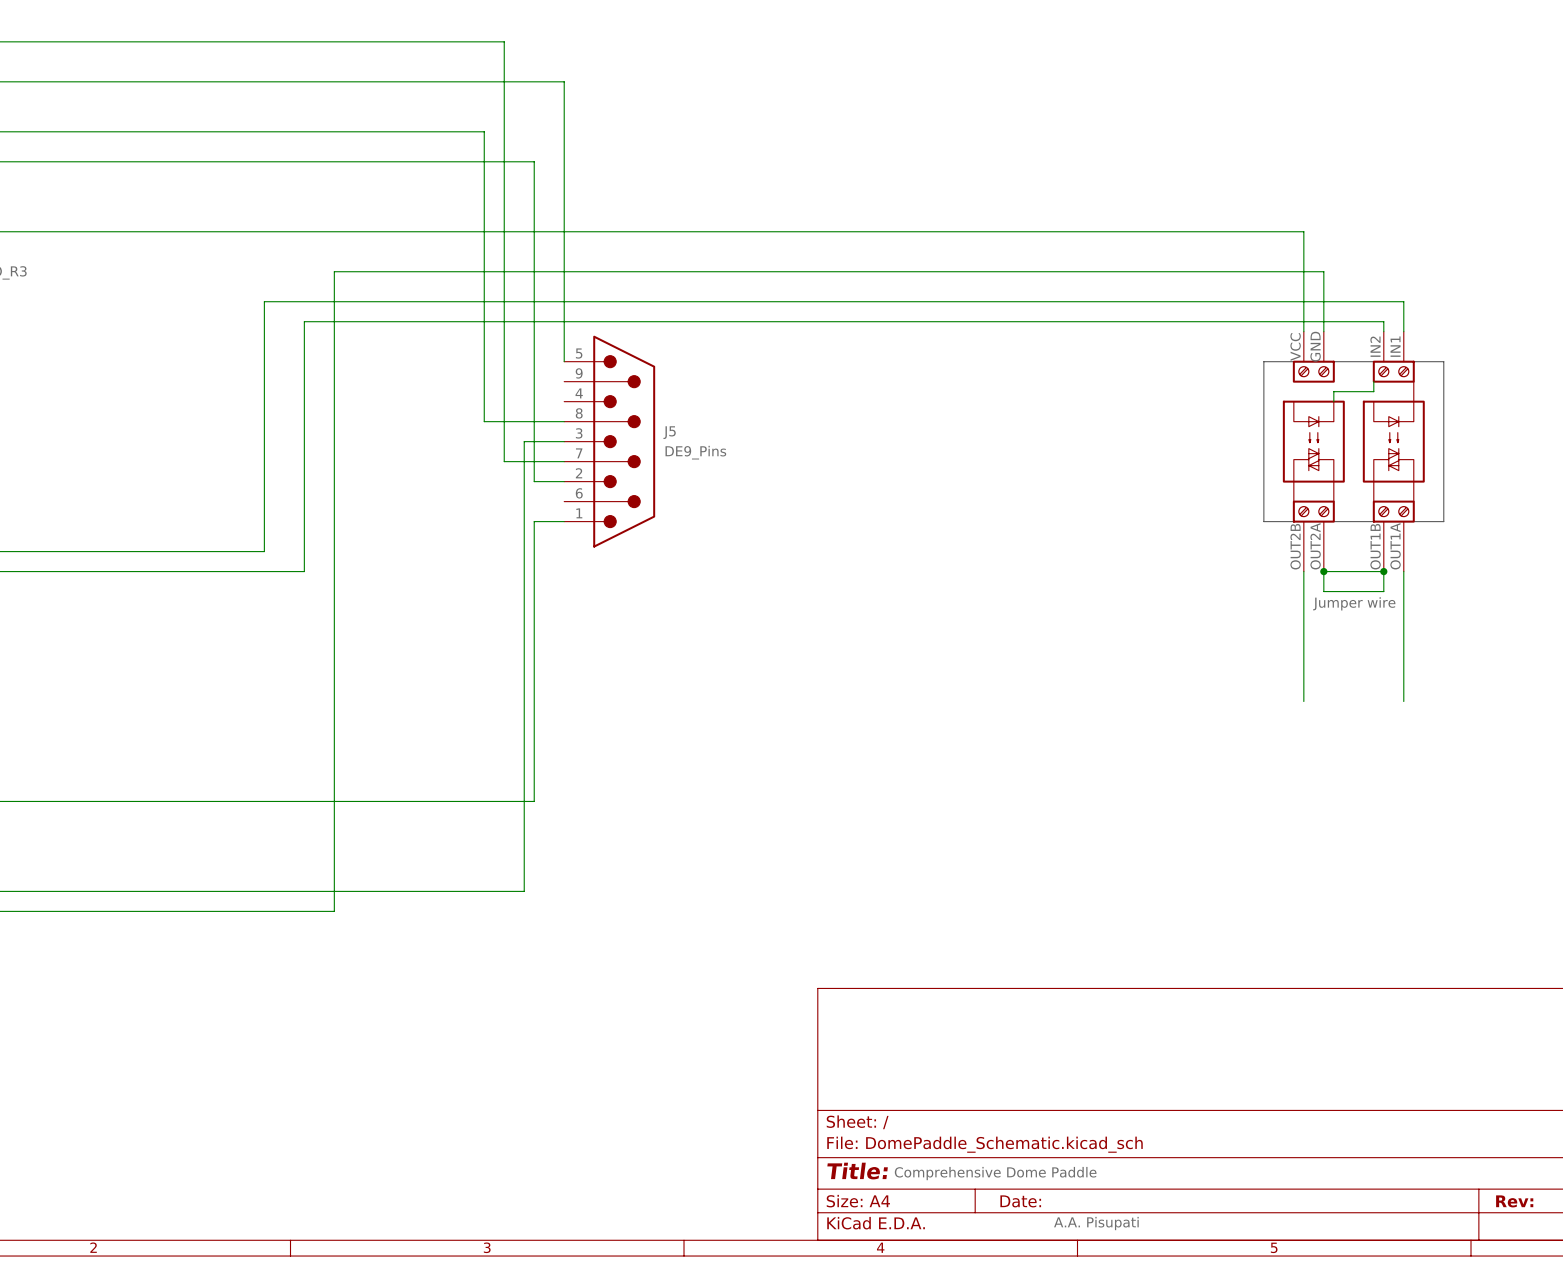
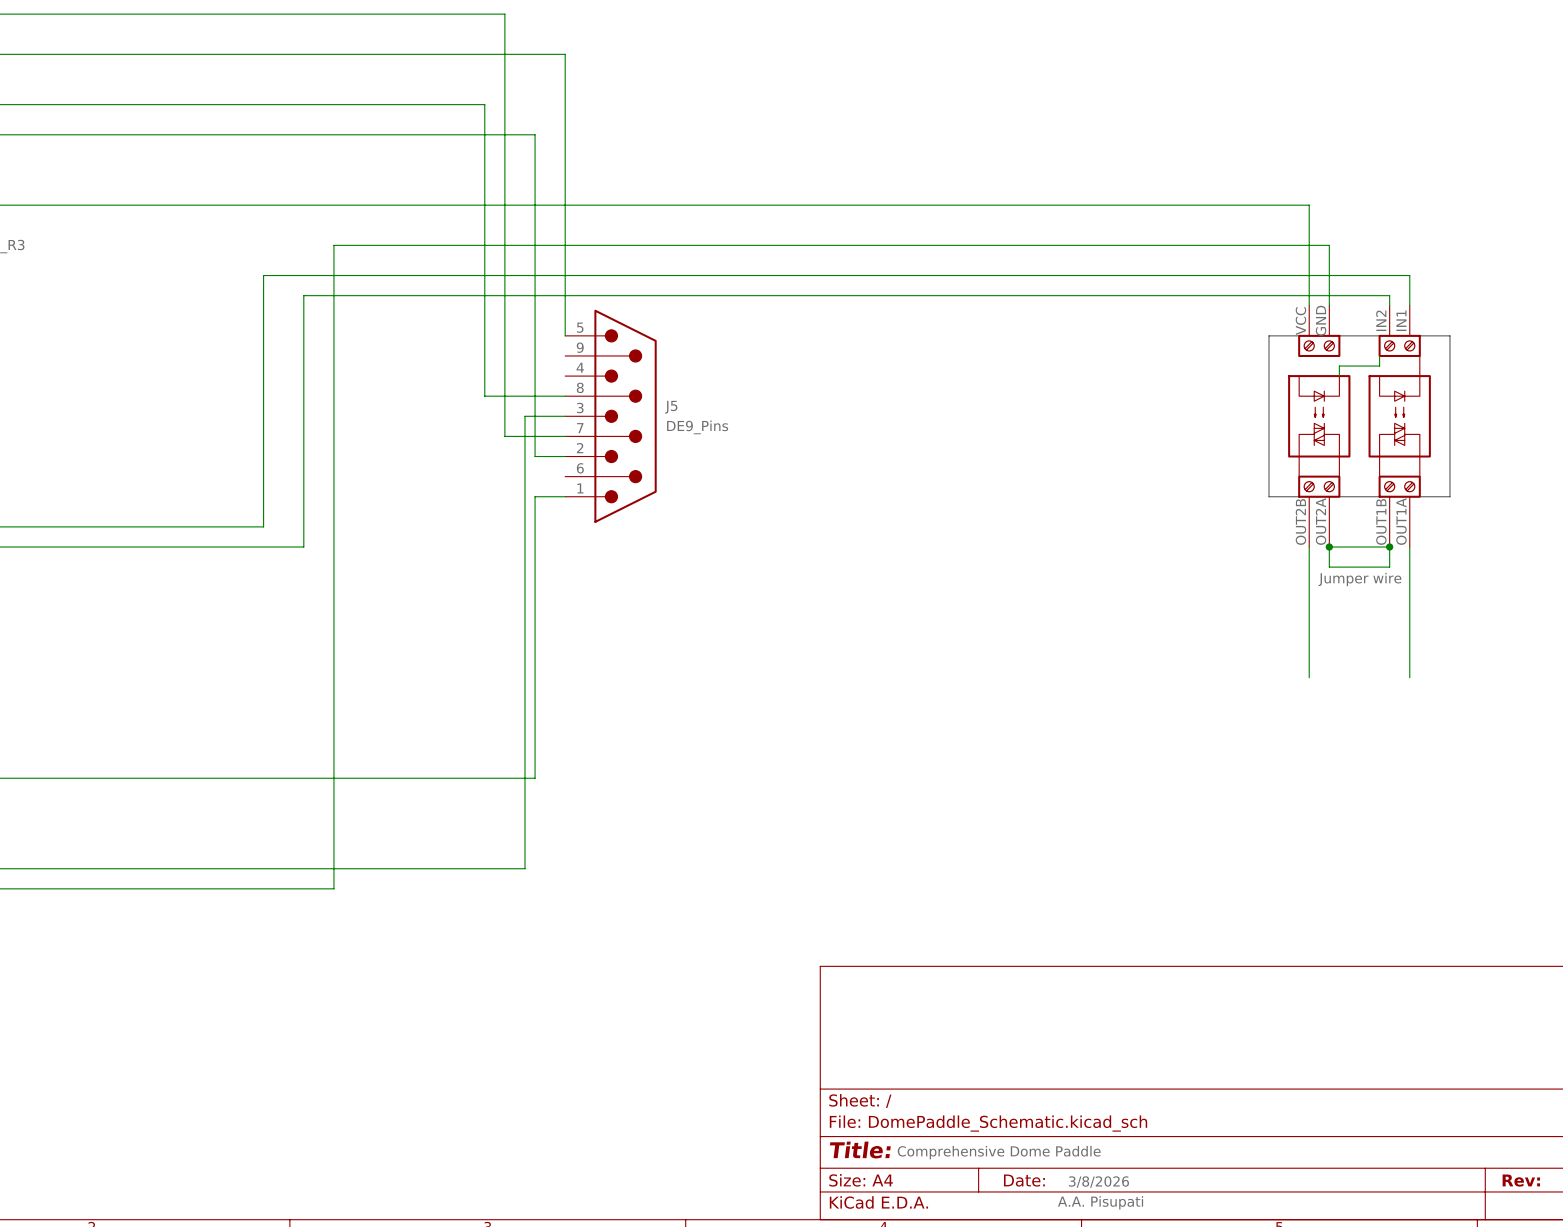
label: none -> 3/8/2026 (1098, 1182)

